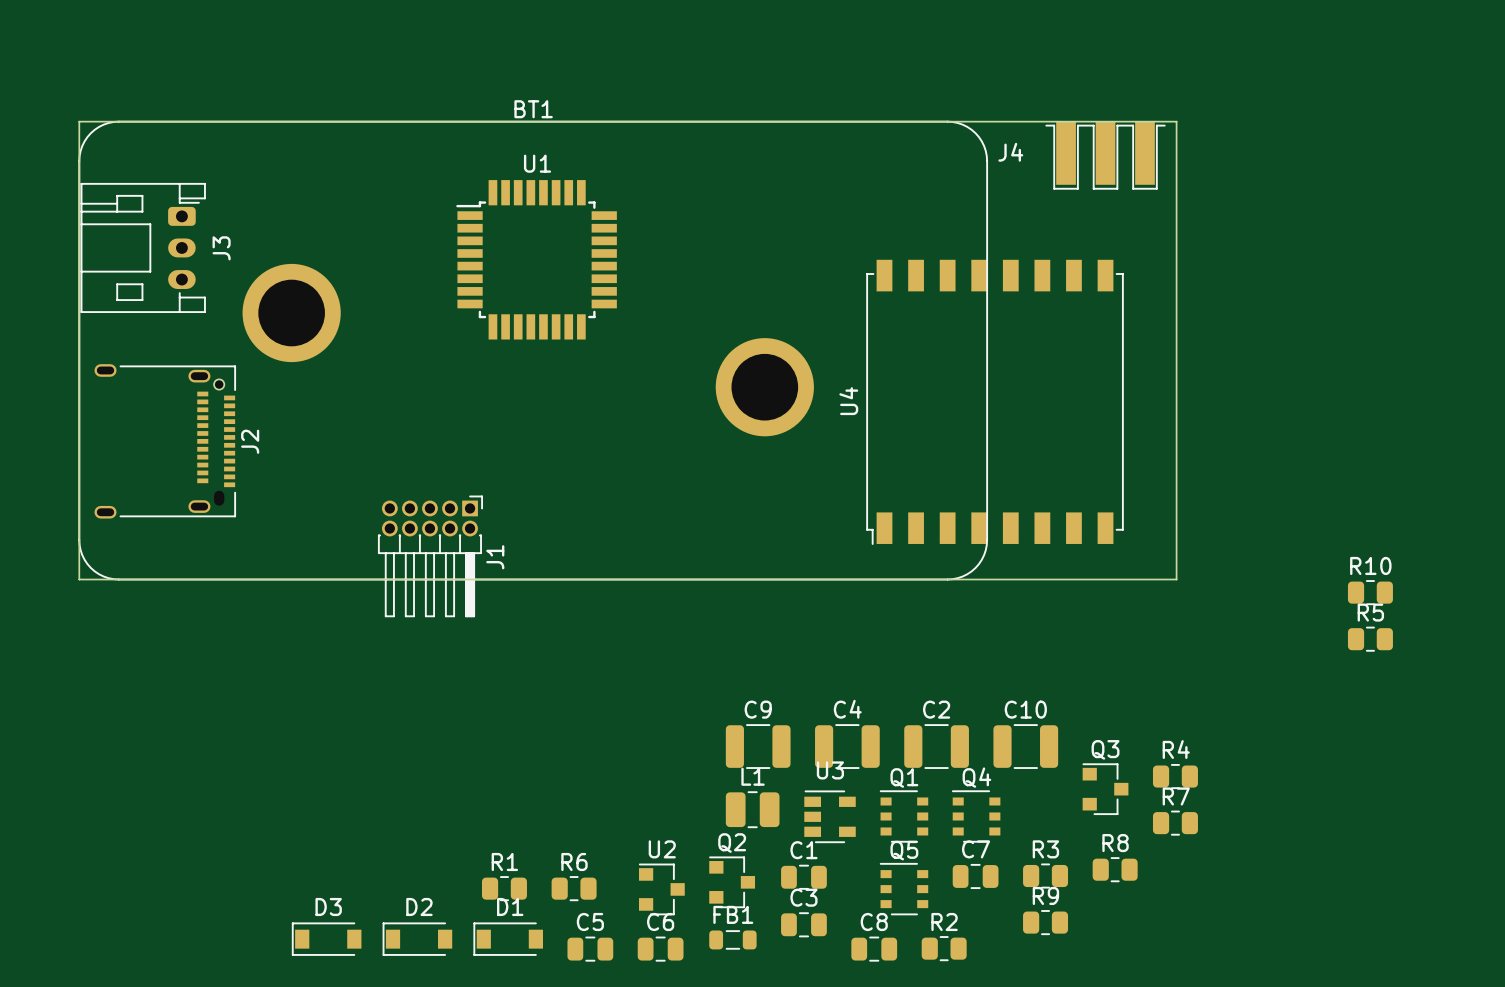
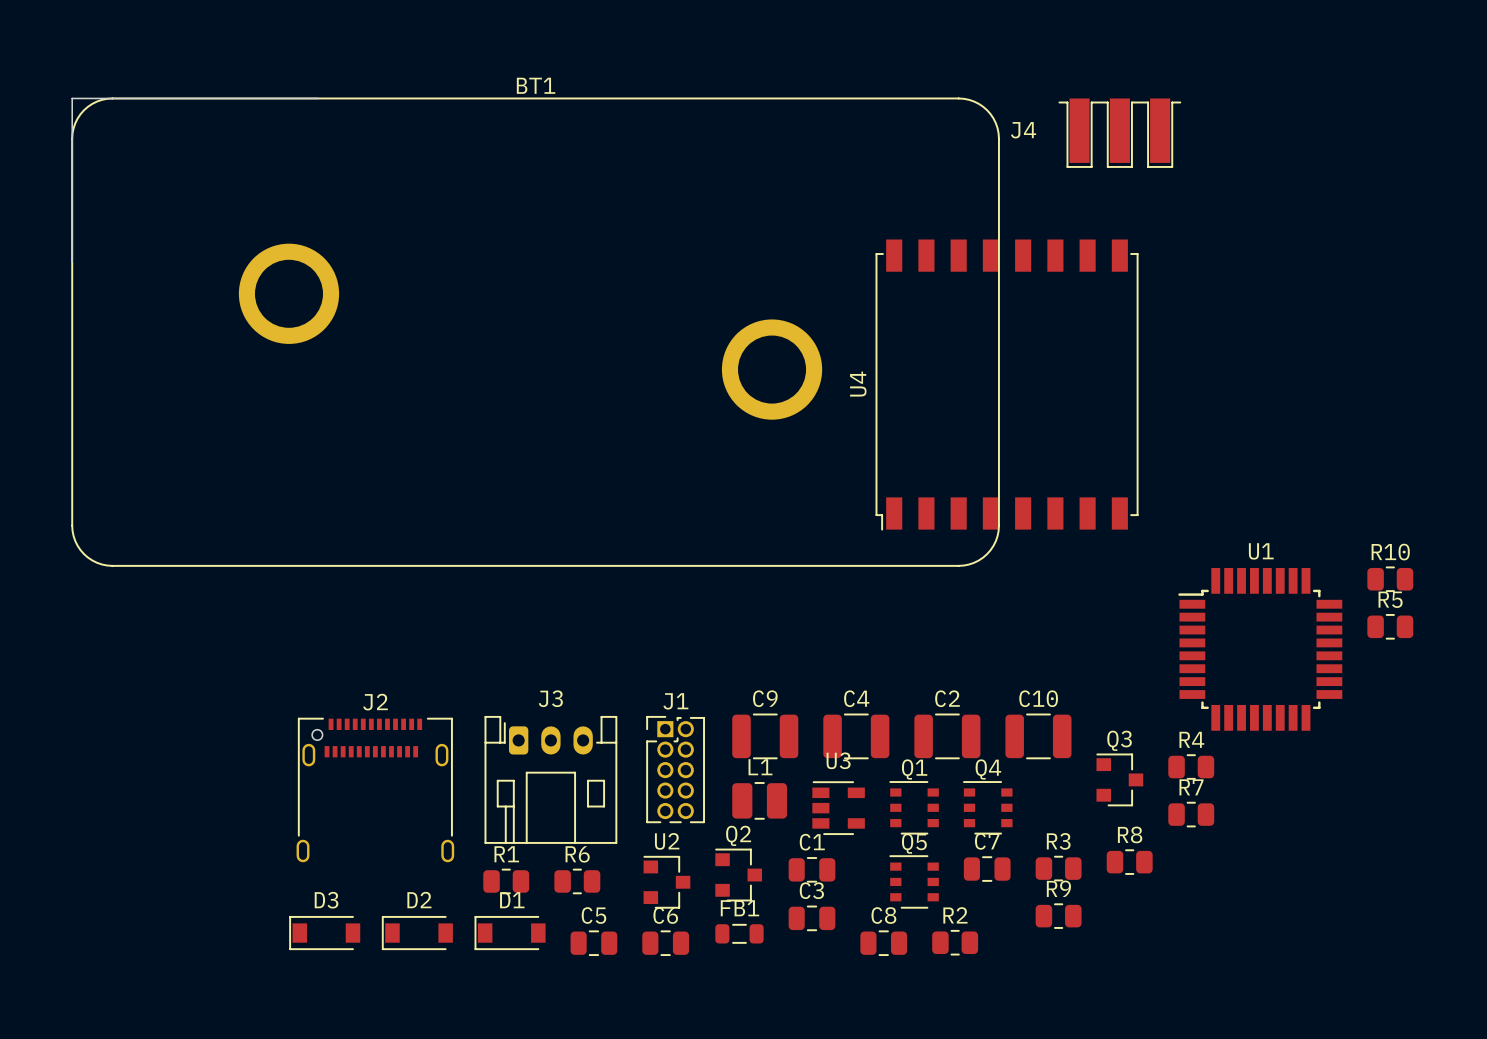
board edge: (319, 121) (1176, 121) (1176, 579) (79, 579) (79, 282) -> none
J3 rotation: 0° (143, 247) -> 90° counterclockwise (550, 779)
J3 position: (143, 247) -> (550, 779)
U1 position: (536, 259) -> (1260, 649)
J2 rotation: 0° (165, 441) -> 90° counterclockwise (375, 789)
J2 position: (165, 441) -> (375, 789)
J1 footprint: [377, 495, 484, 618] -> [646, 715, 705, 824]
J1 name position: J1 (495, 557) -> J1 (675, 701)

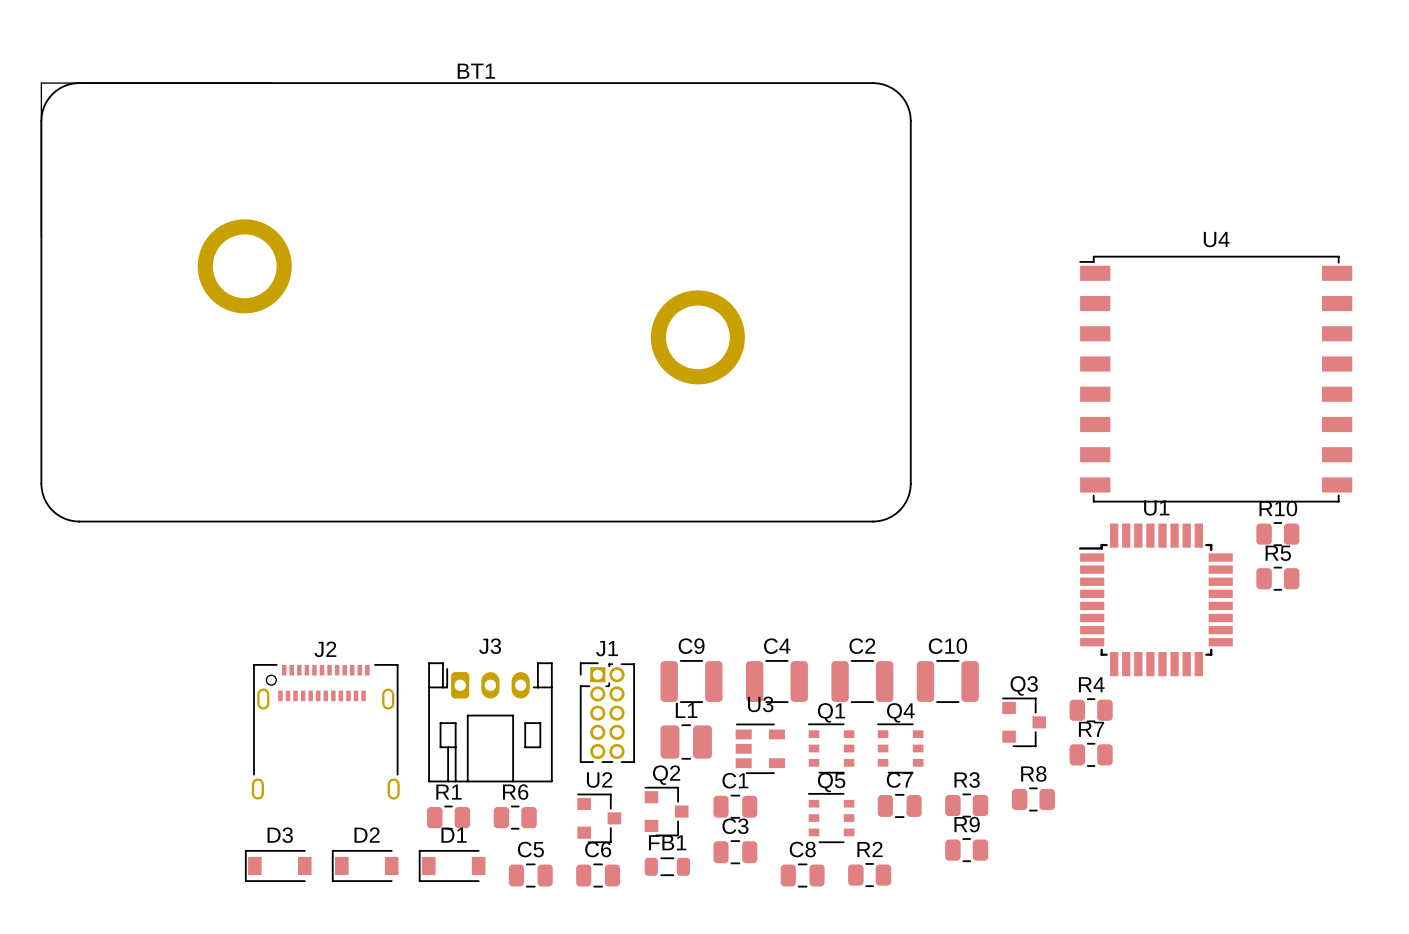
J4: (1119, 133) -> none
U4 rotation: 0° (1007, 385) -> 90° clockwise (1215, 379)
U4 position: (1007, 385) -> (1215, 379)

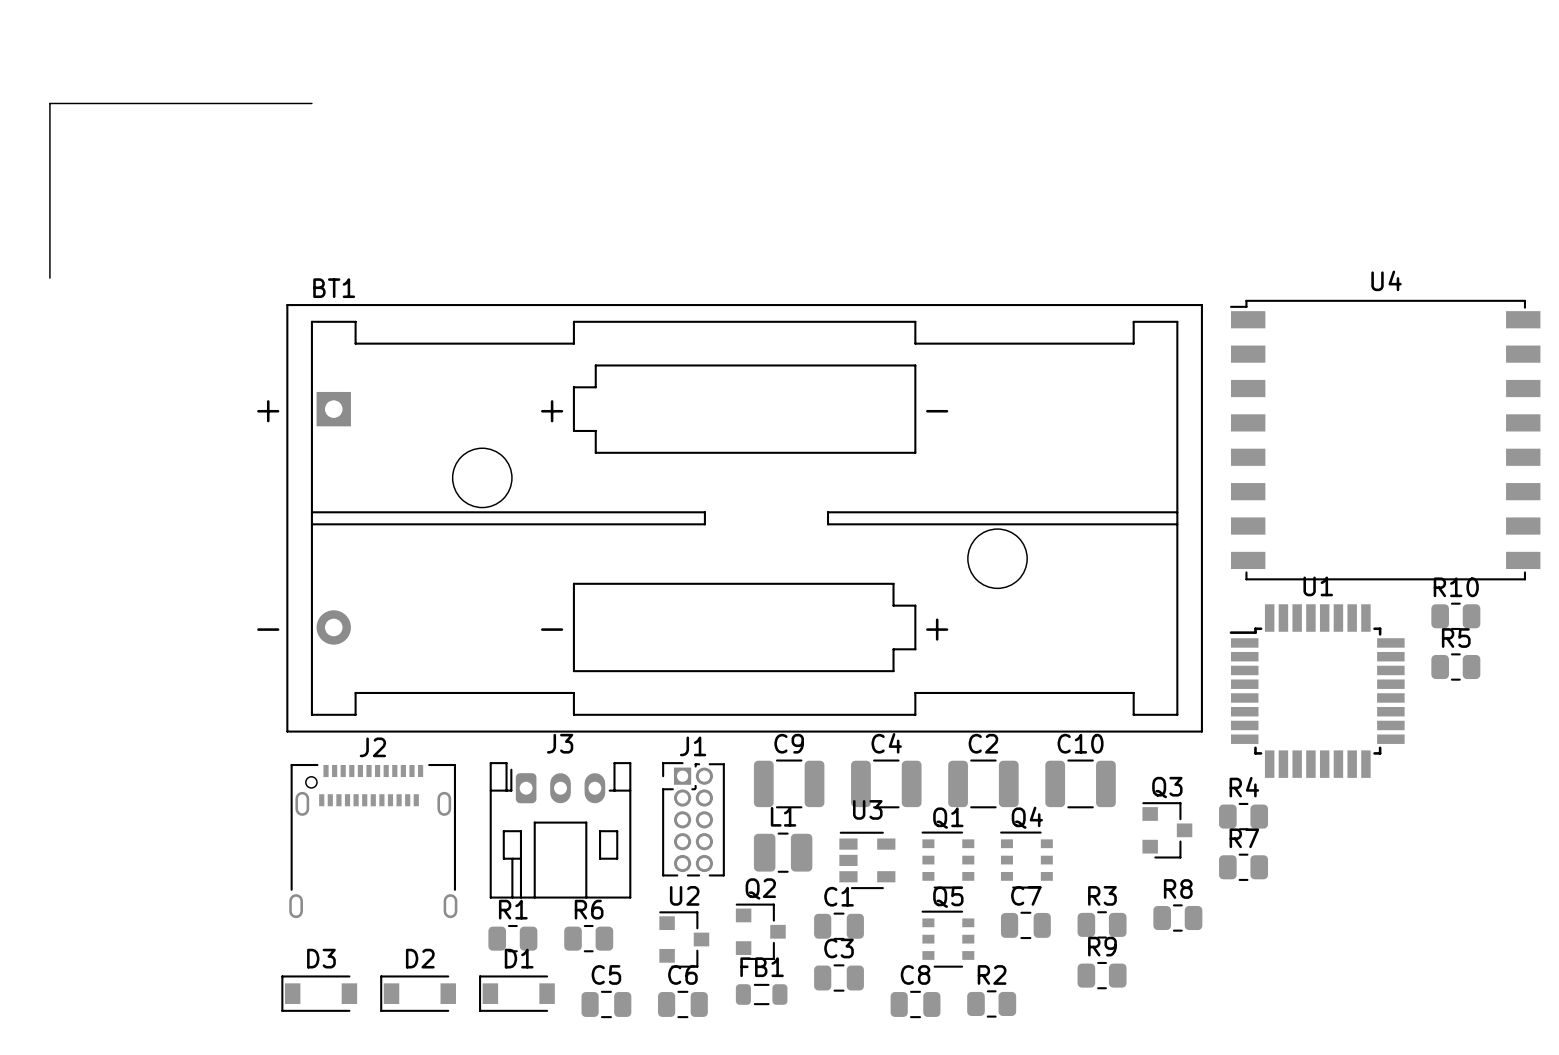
BT1 name position: BT1 (476, 71) -> BT1 (334, 288)
BT1 footprint: [40, 82, 912, 523] -> [286, 304, 1203, 733]

